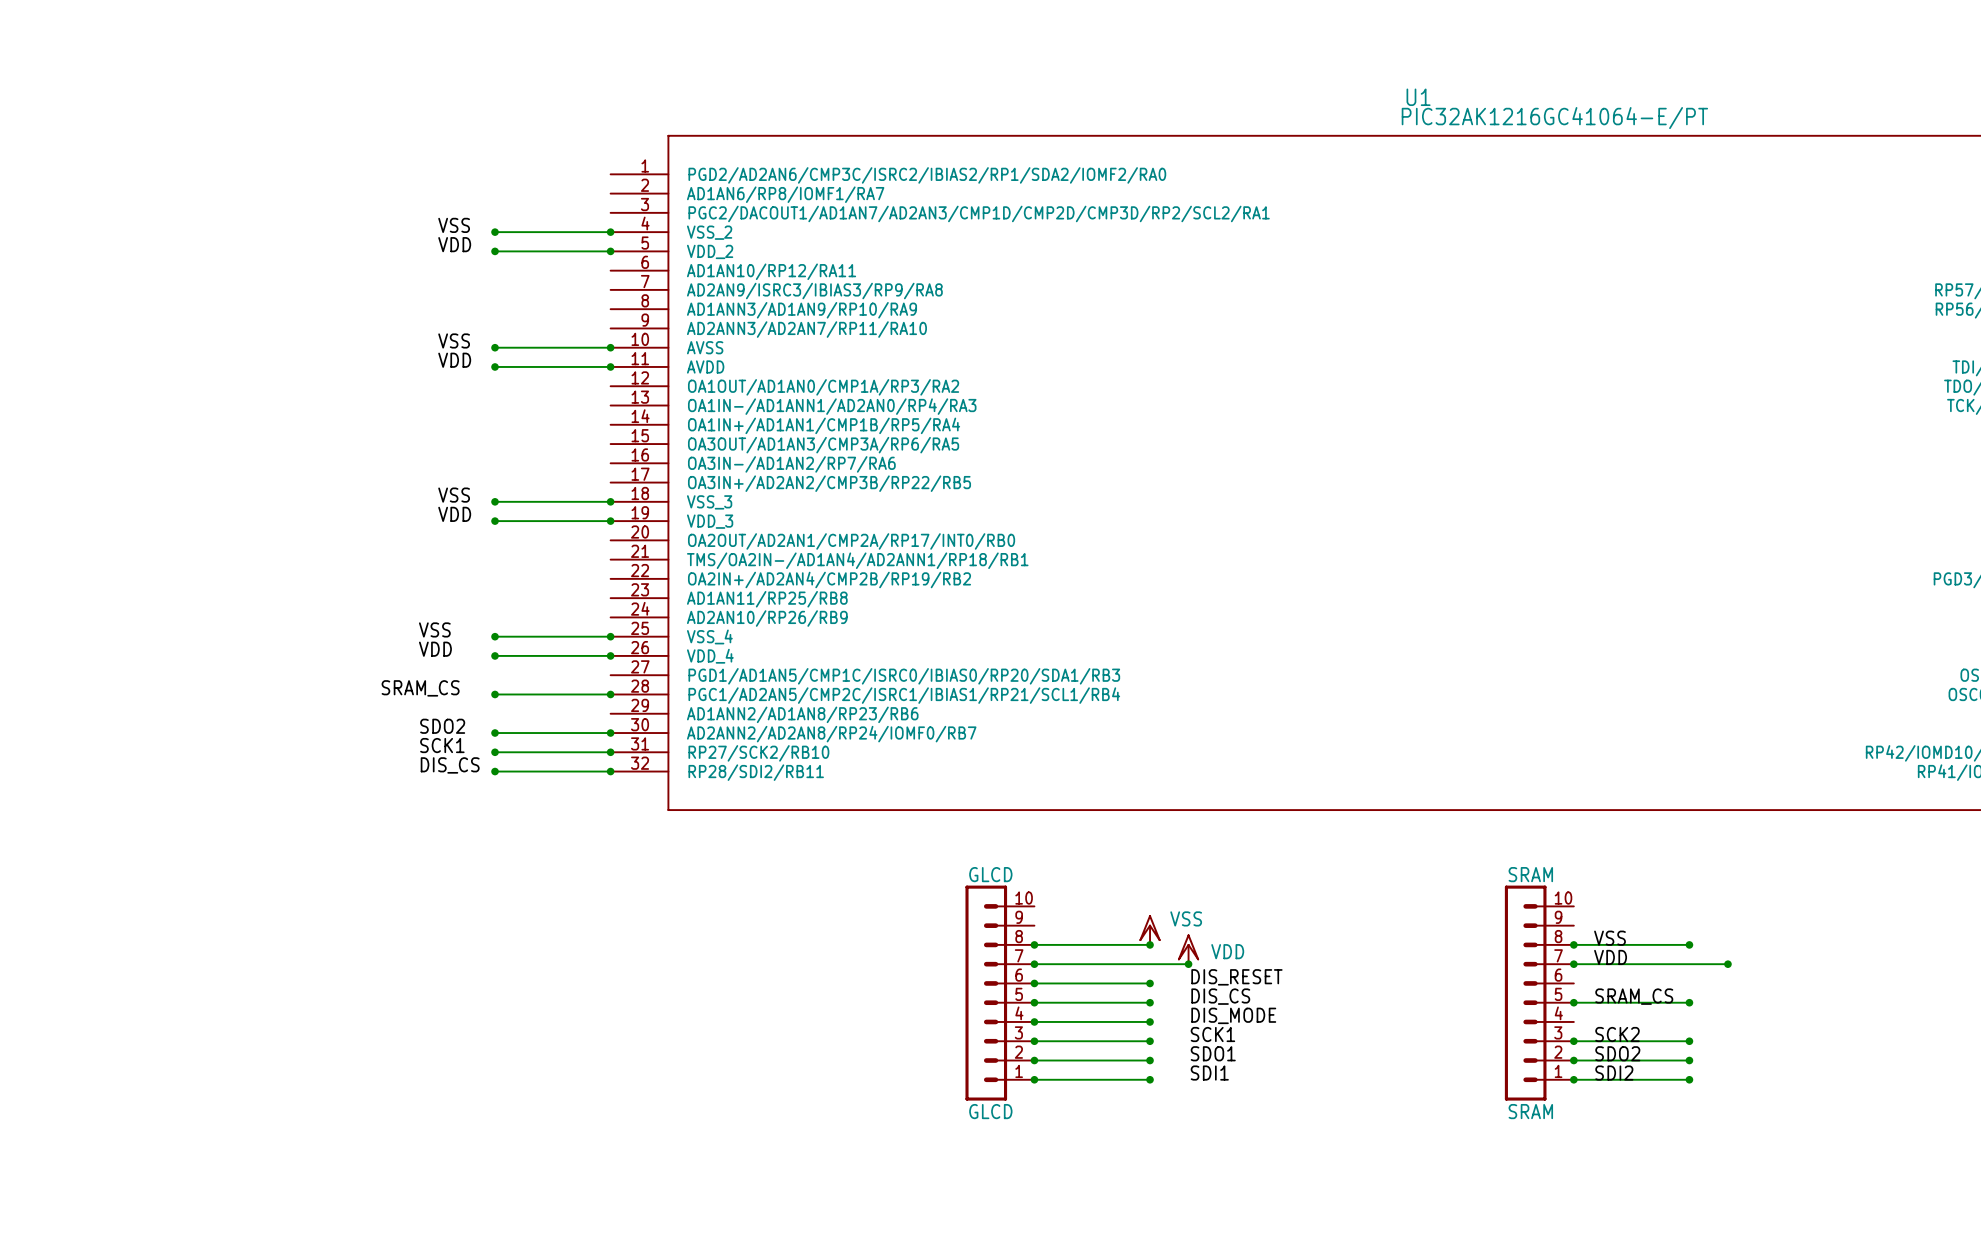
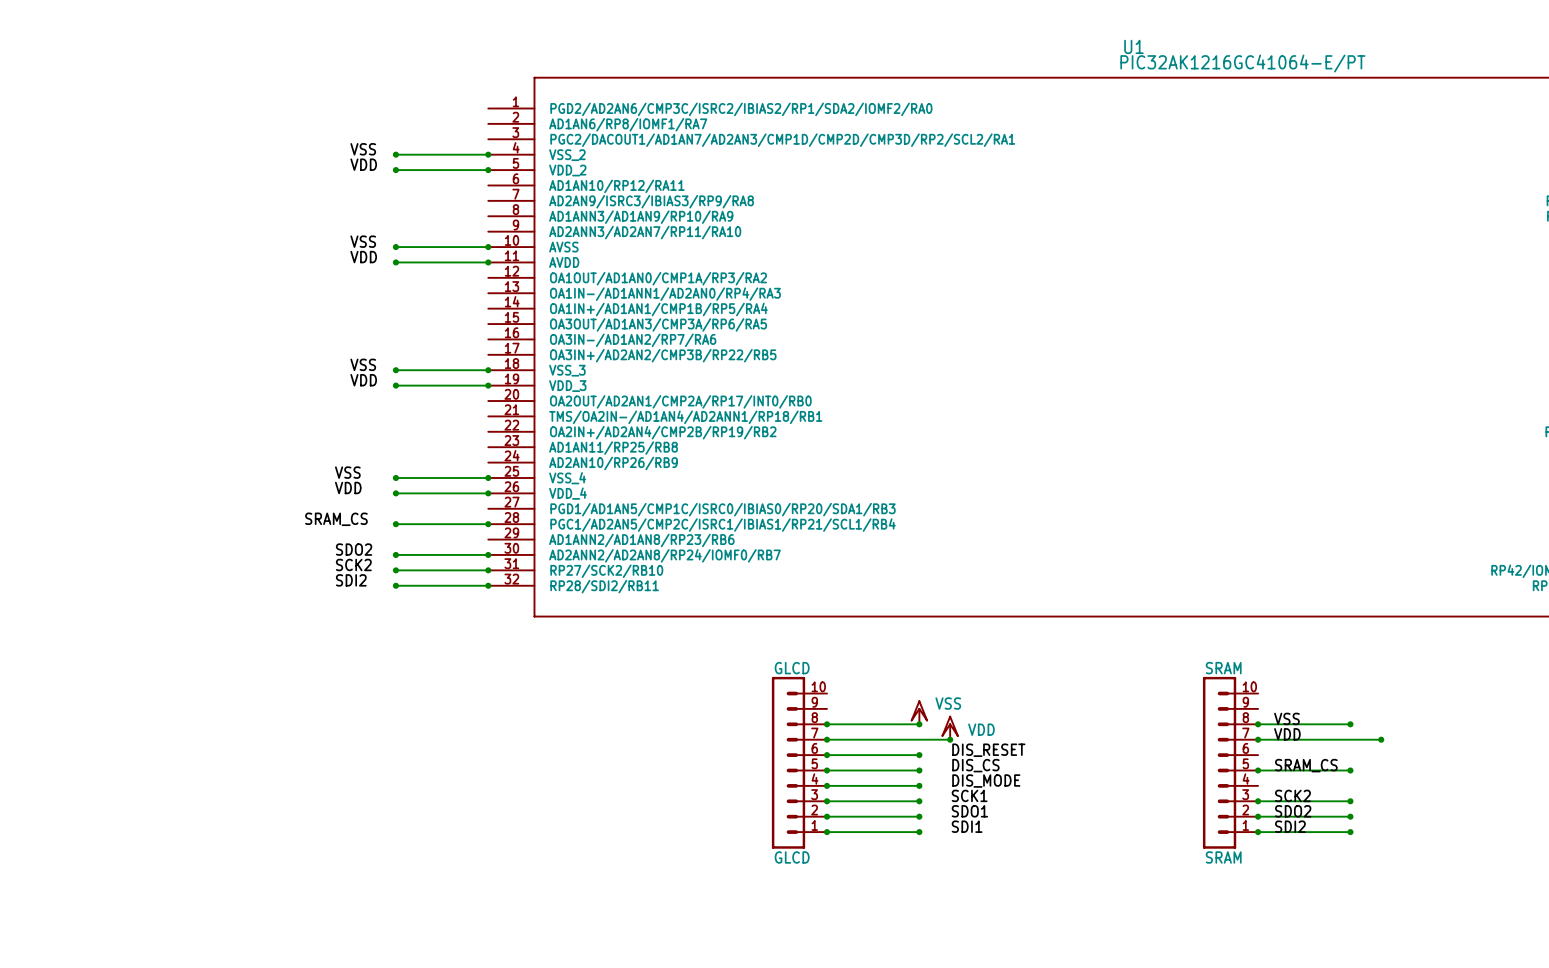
label: SCK1 (442, 745) -> SCK2 (353, 564)
label: DIS_CS (450, 765) -> SDI2 (351, 580)

